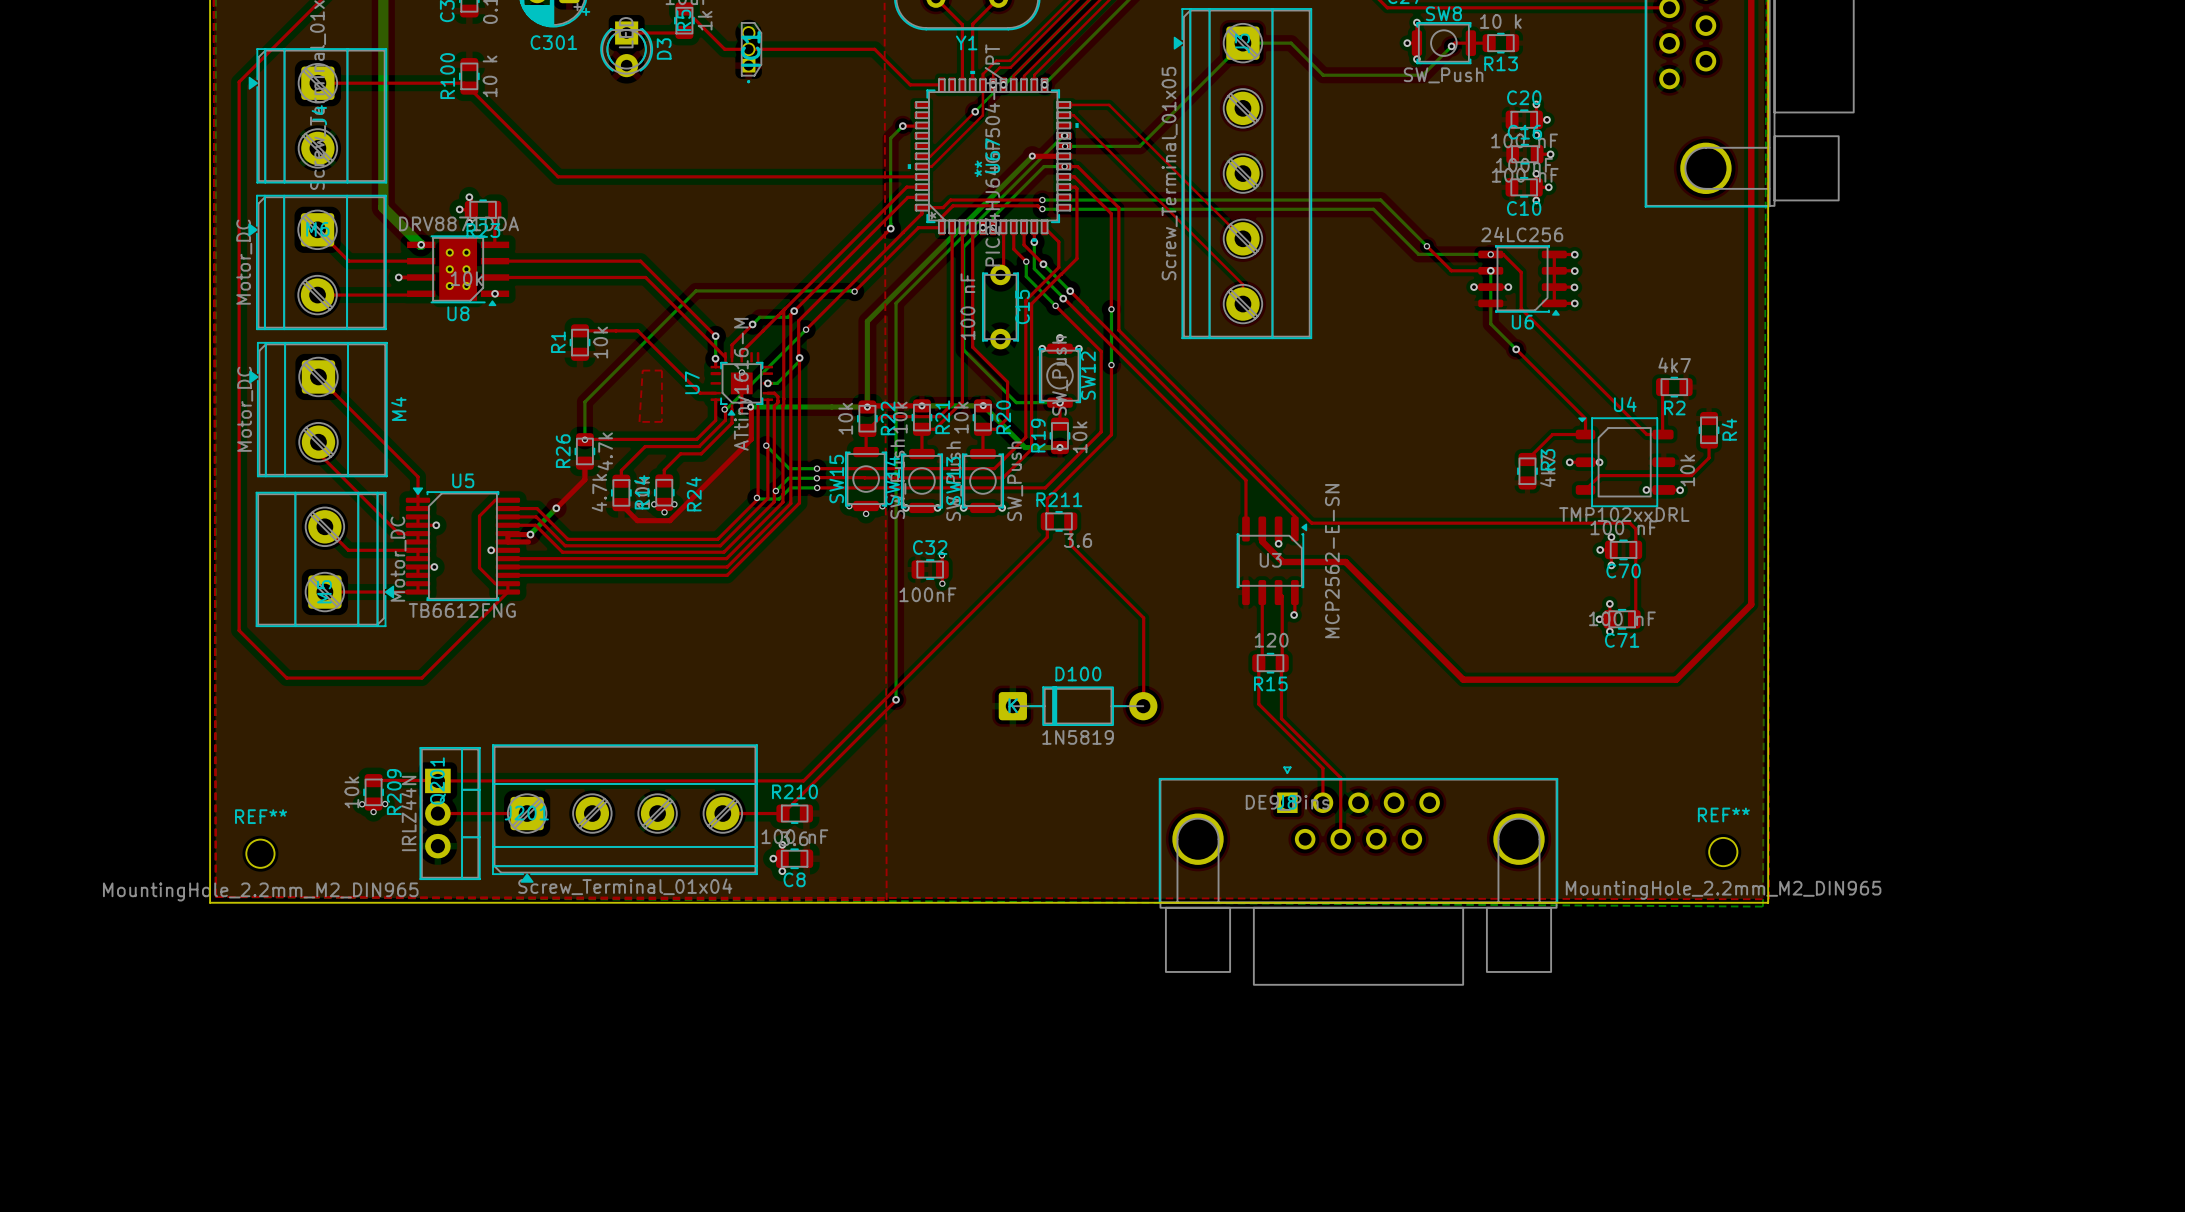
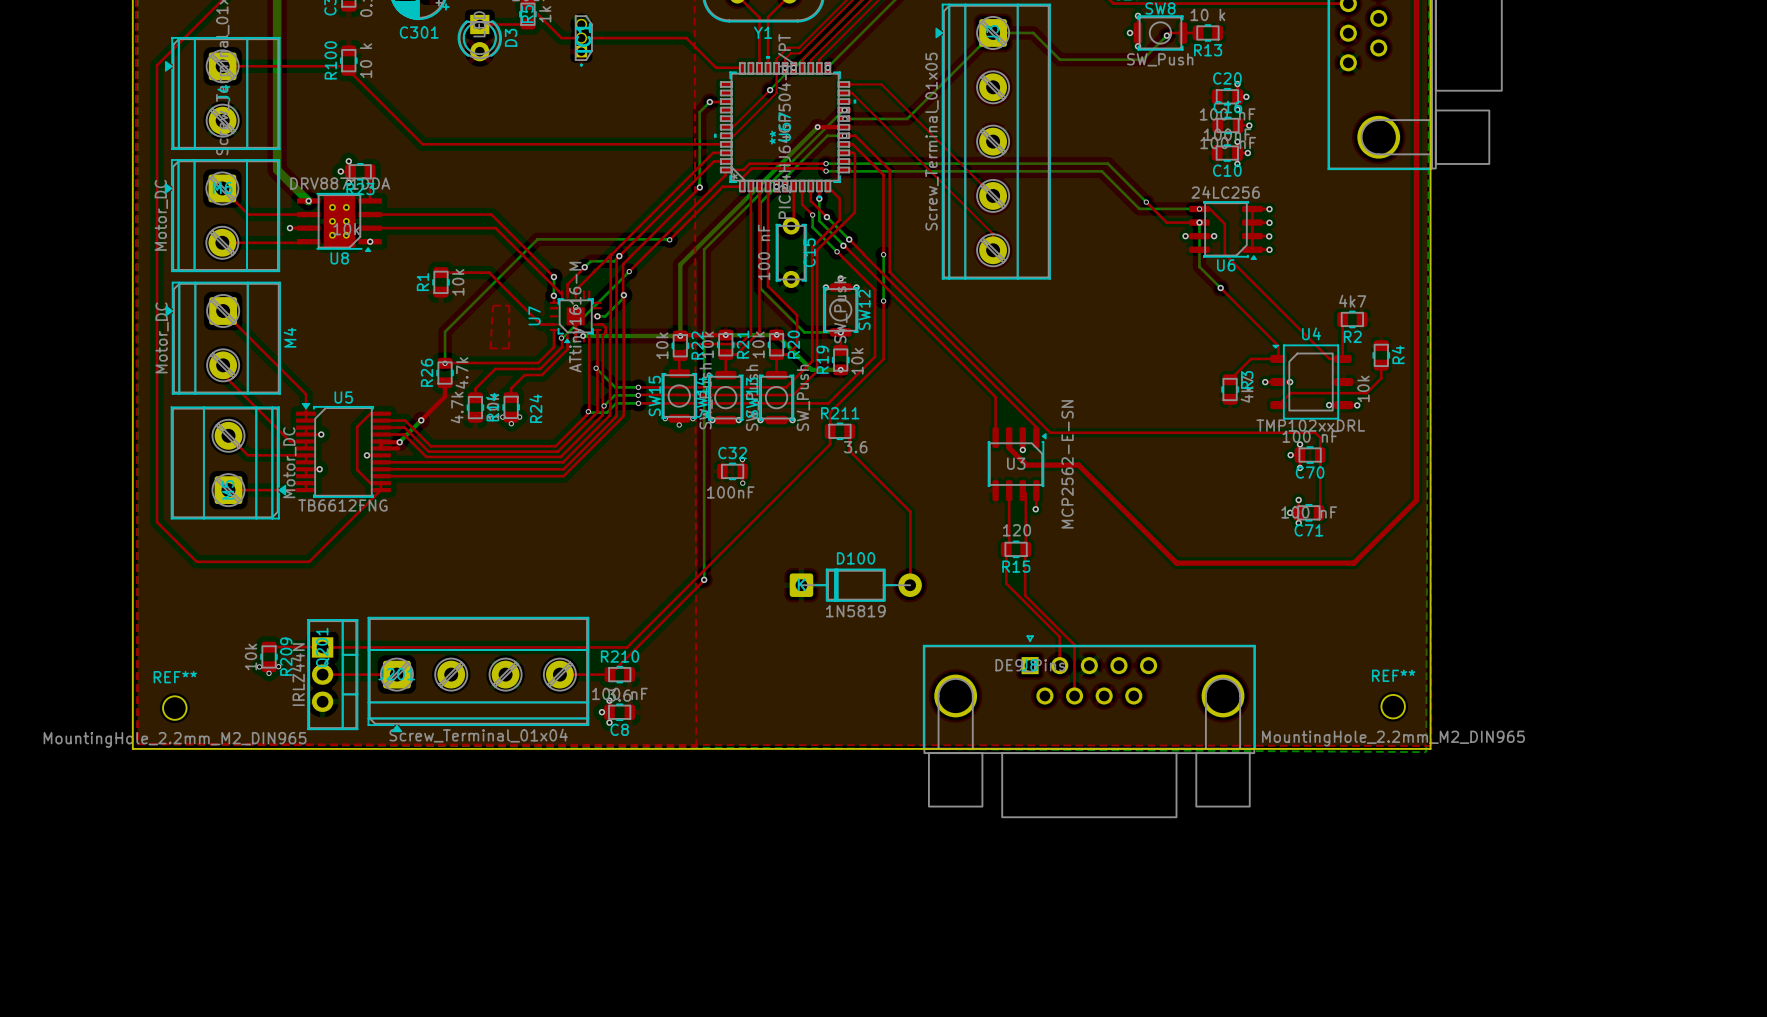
top track: (751, 409) (751, 439) (669, 520) (637, 520) (621, 504) -> none

